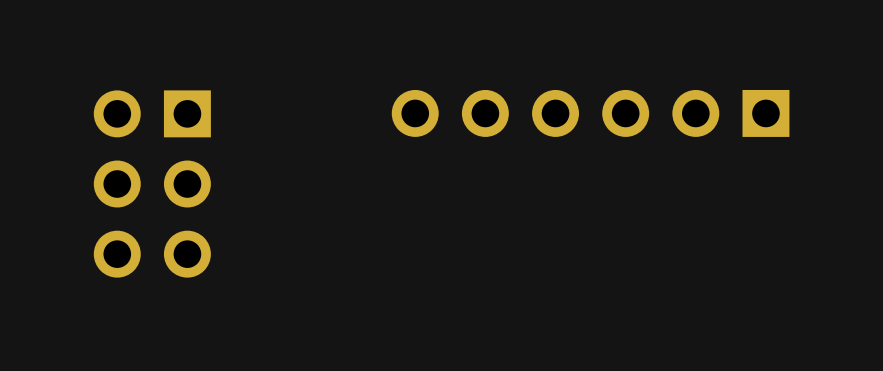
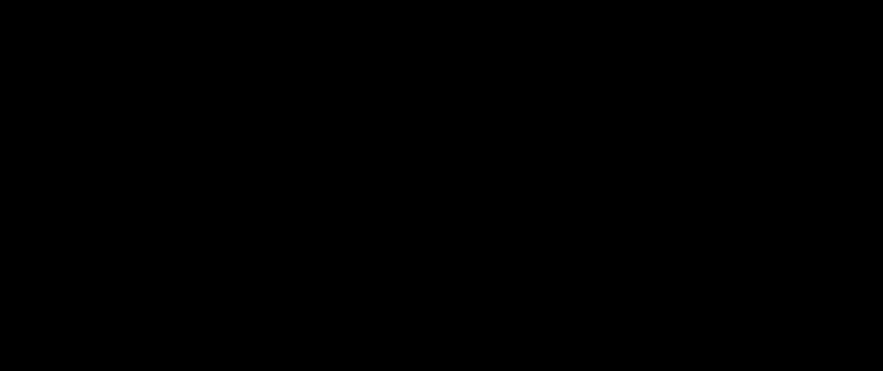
part: (590, 113) -> none
part: (152, 184) -> none

